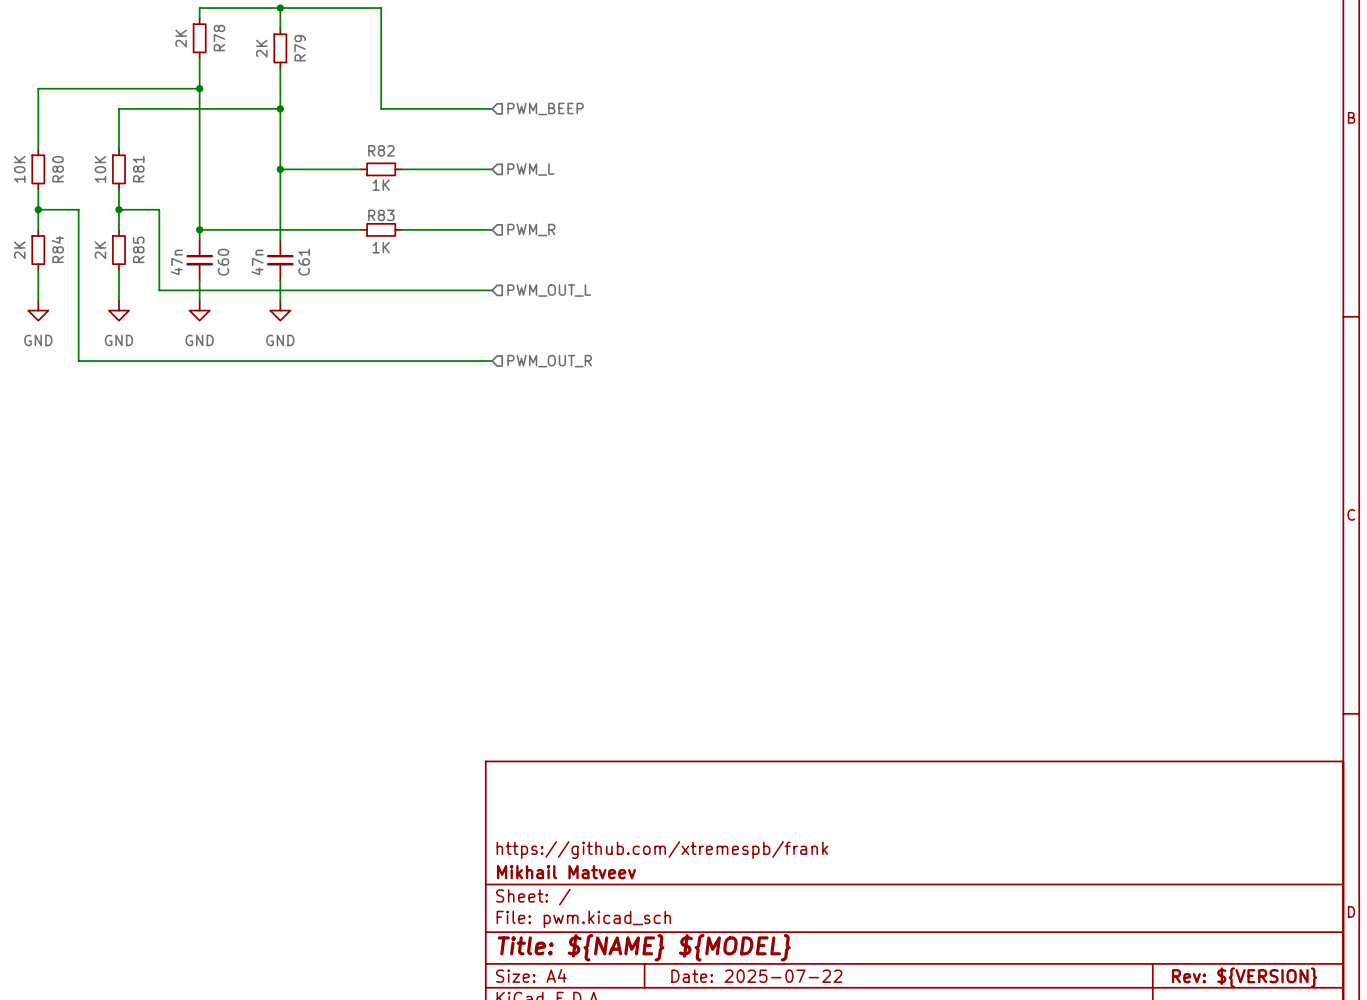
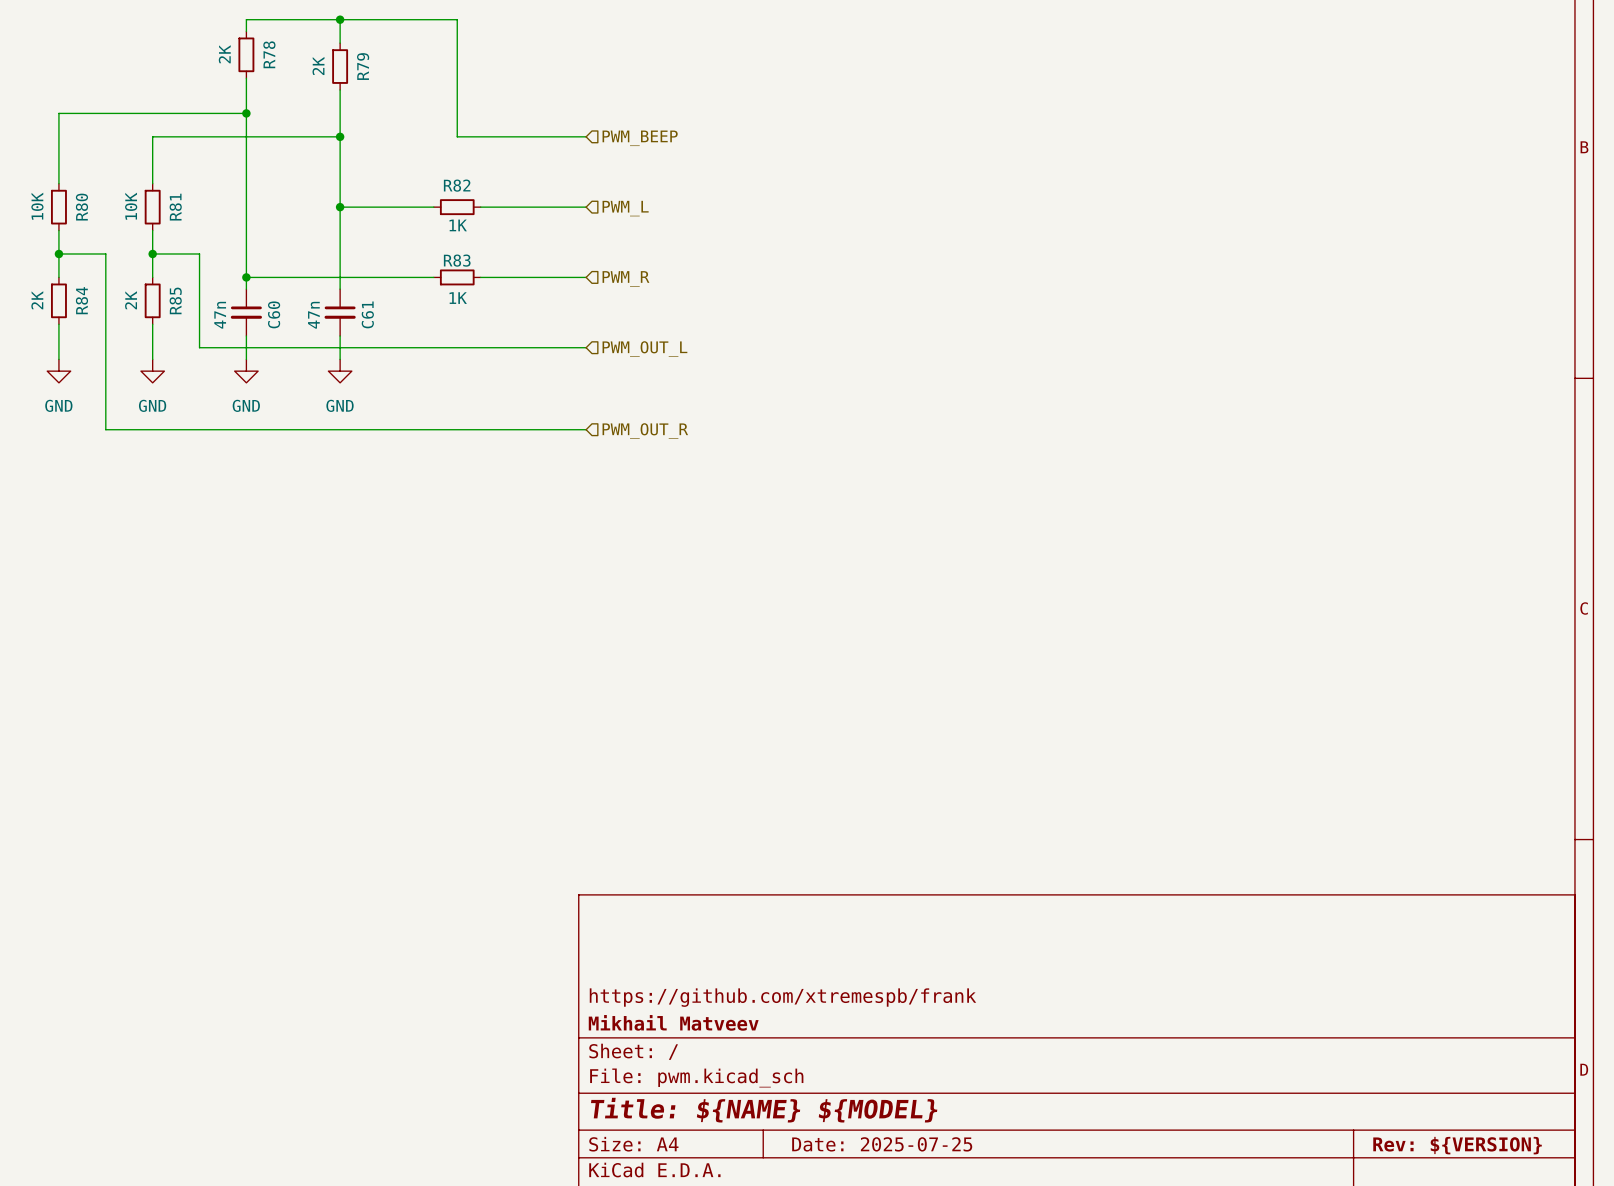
title block: Date: 2025-07-22 (756, 976) -> Date: 2025-07-25 (882, 1144)

